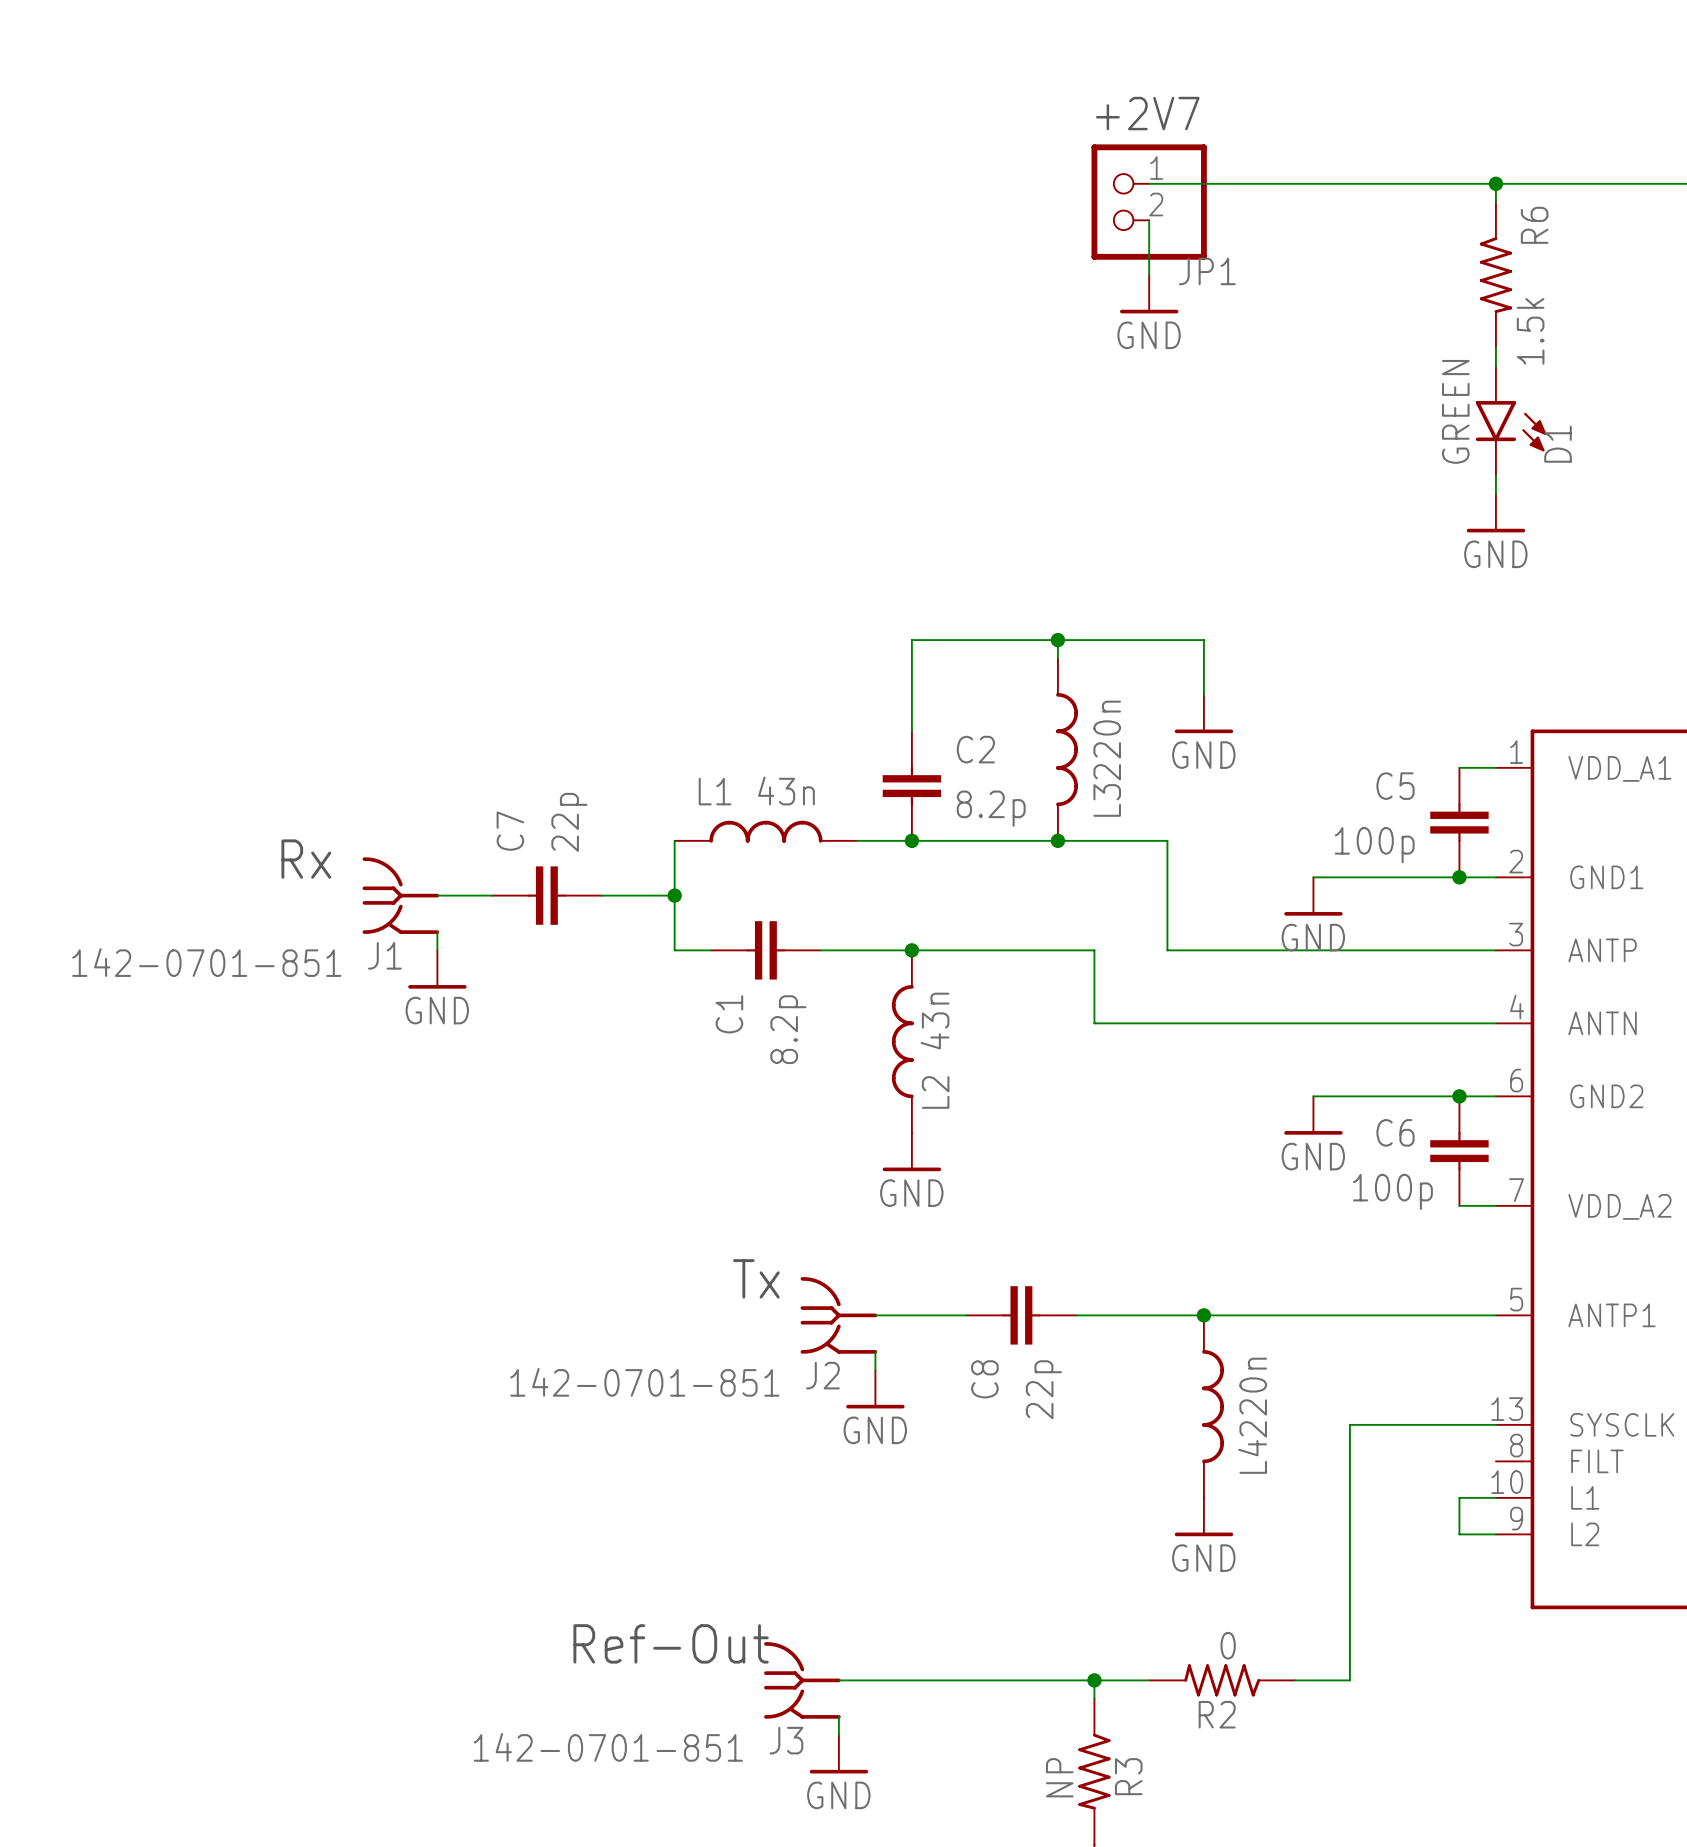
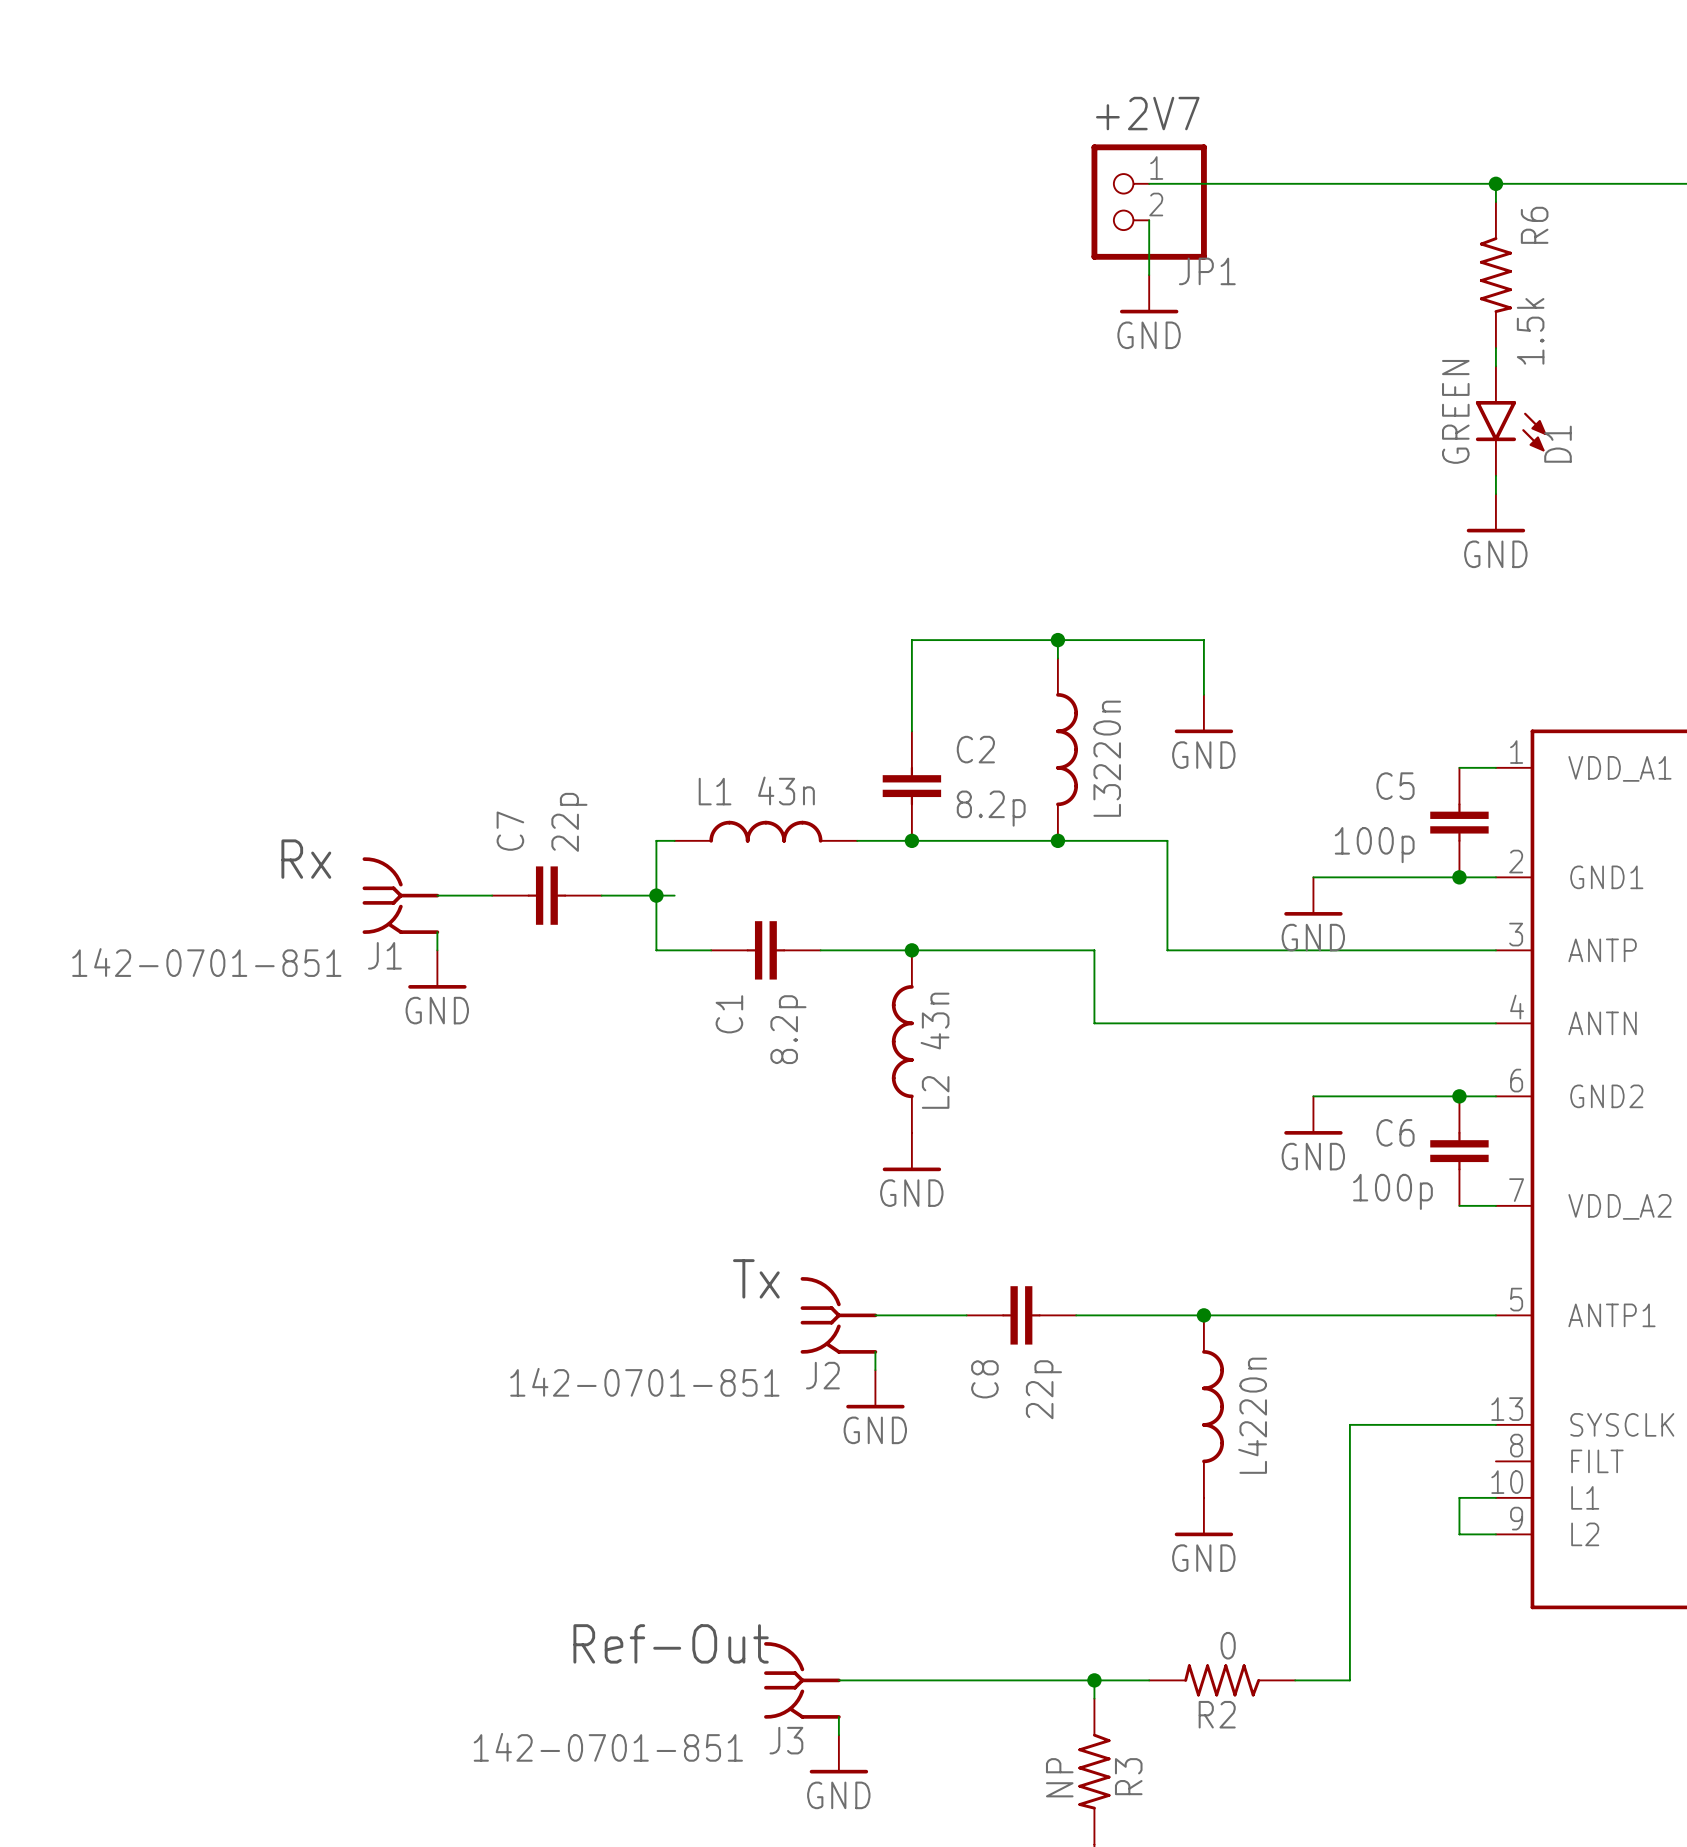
wire: (674, 840) (674, 950) -> (674, 840) (656, 840) (656, 950) (674, 950)
junction position: (674, 895) -> (656, 895)

